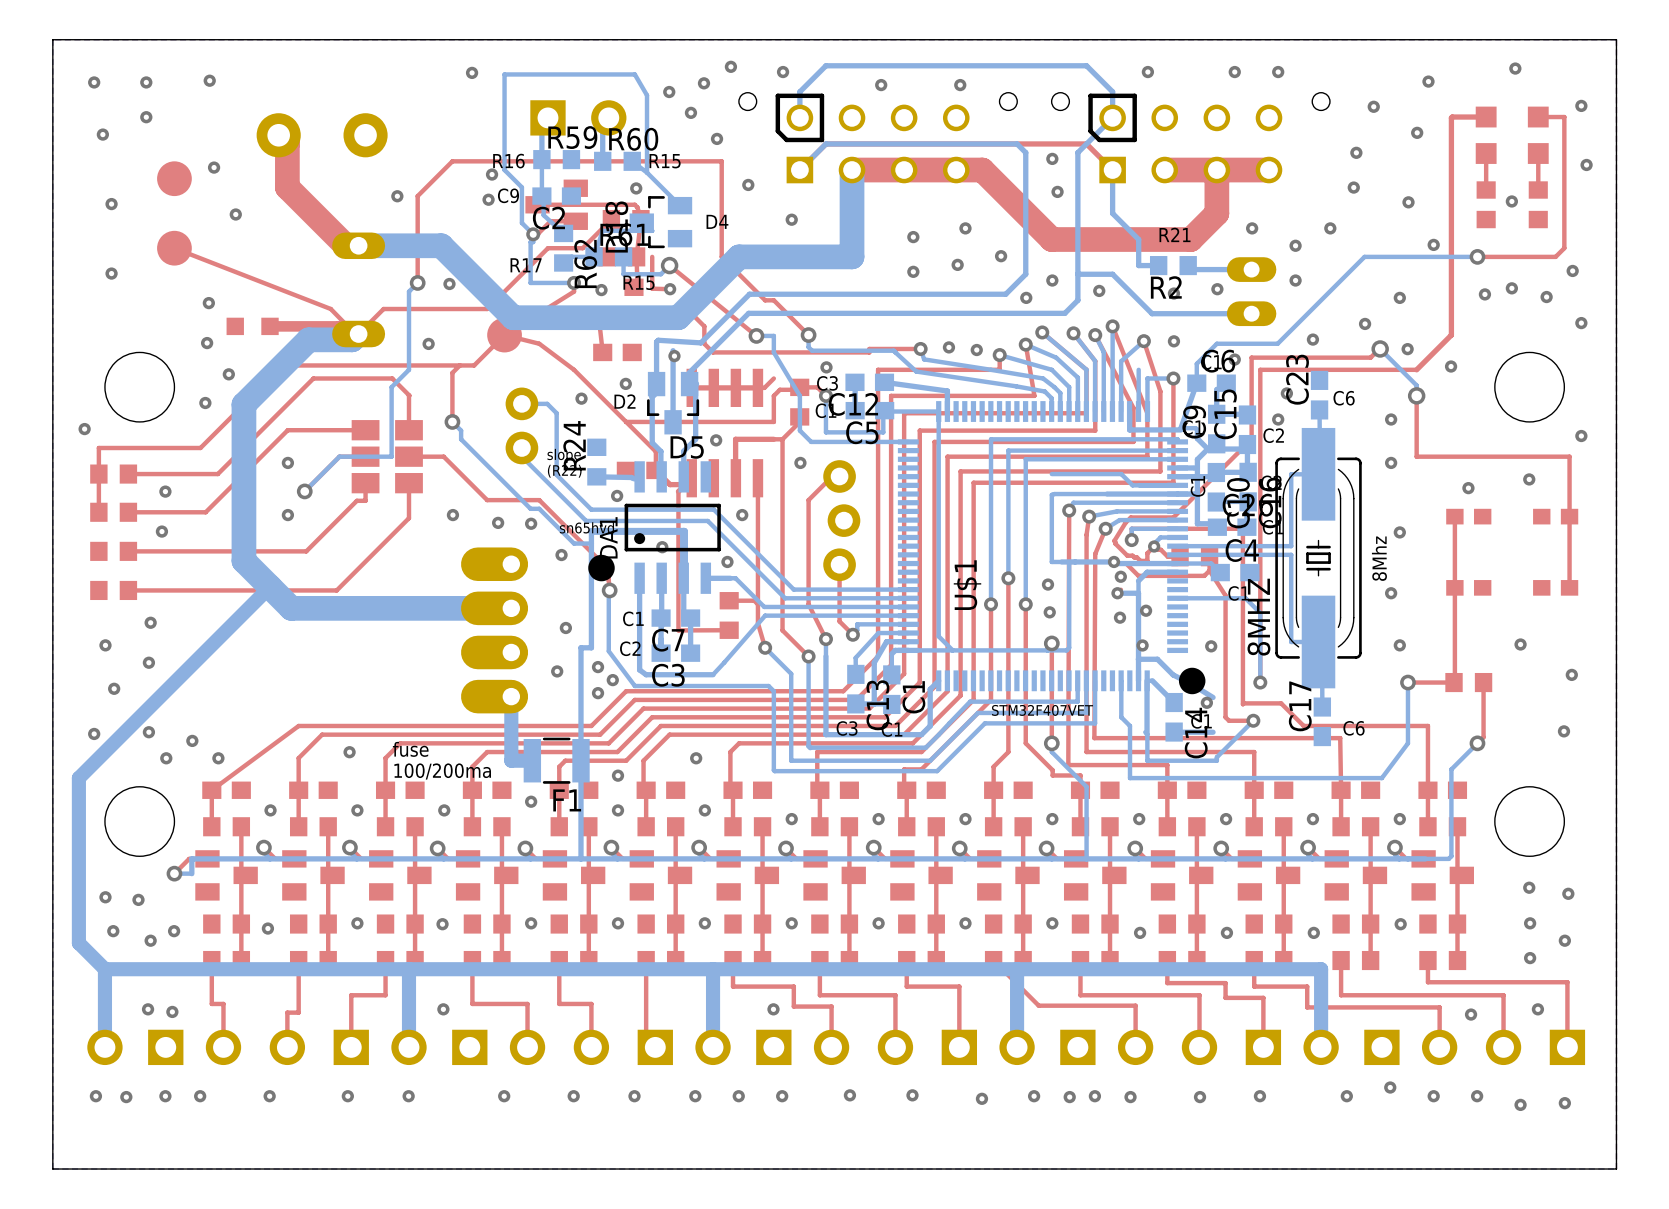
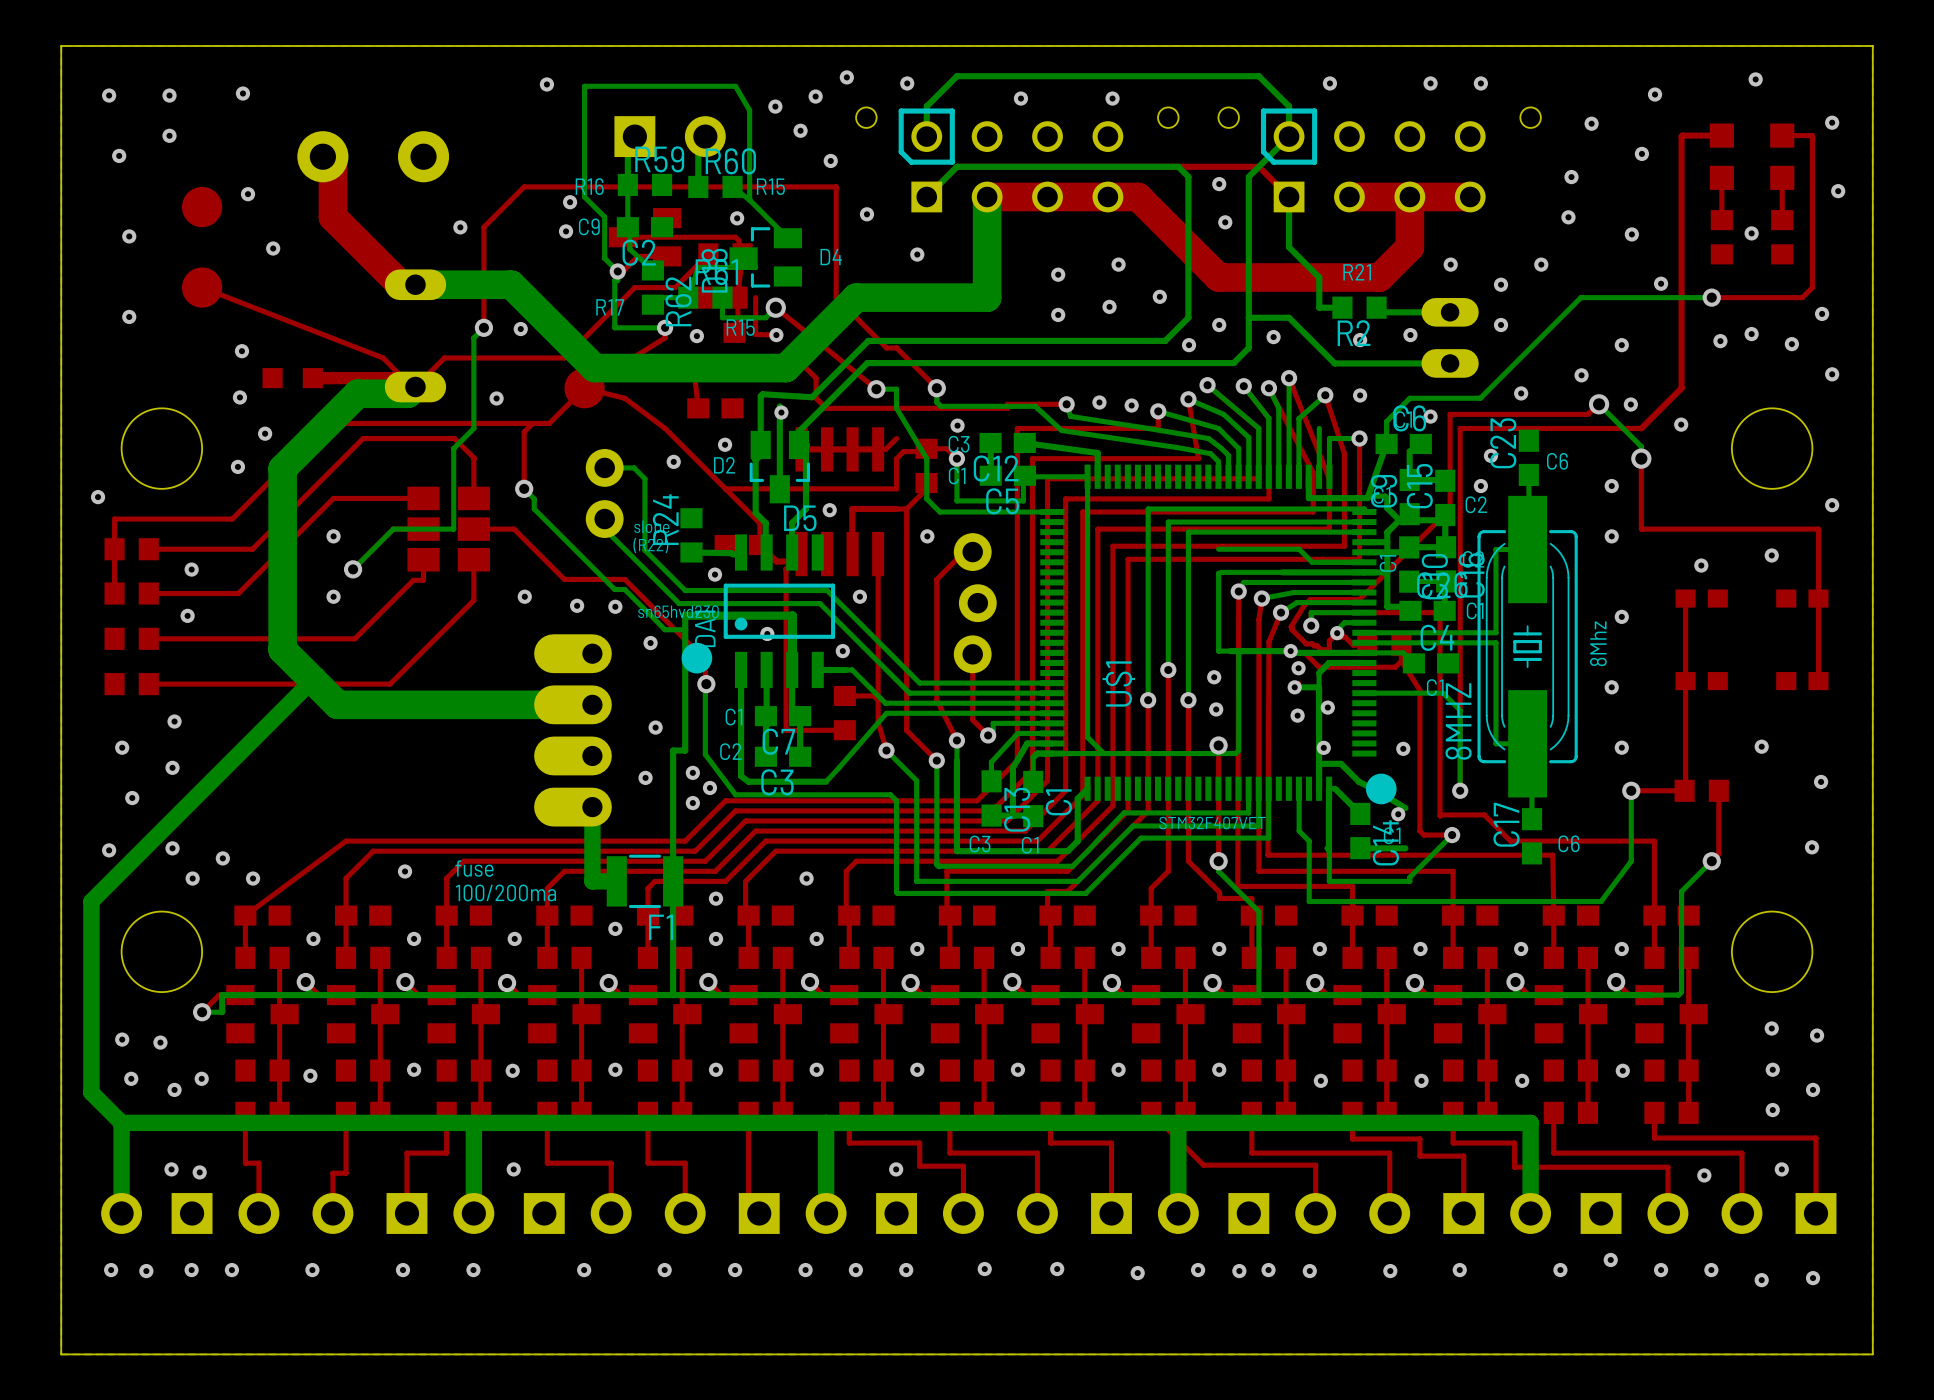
text: sn65hvd (586, 527) -> sn65hvd230 (678, 611)

